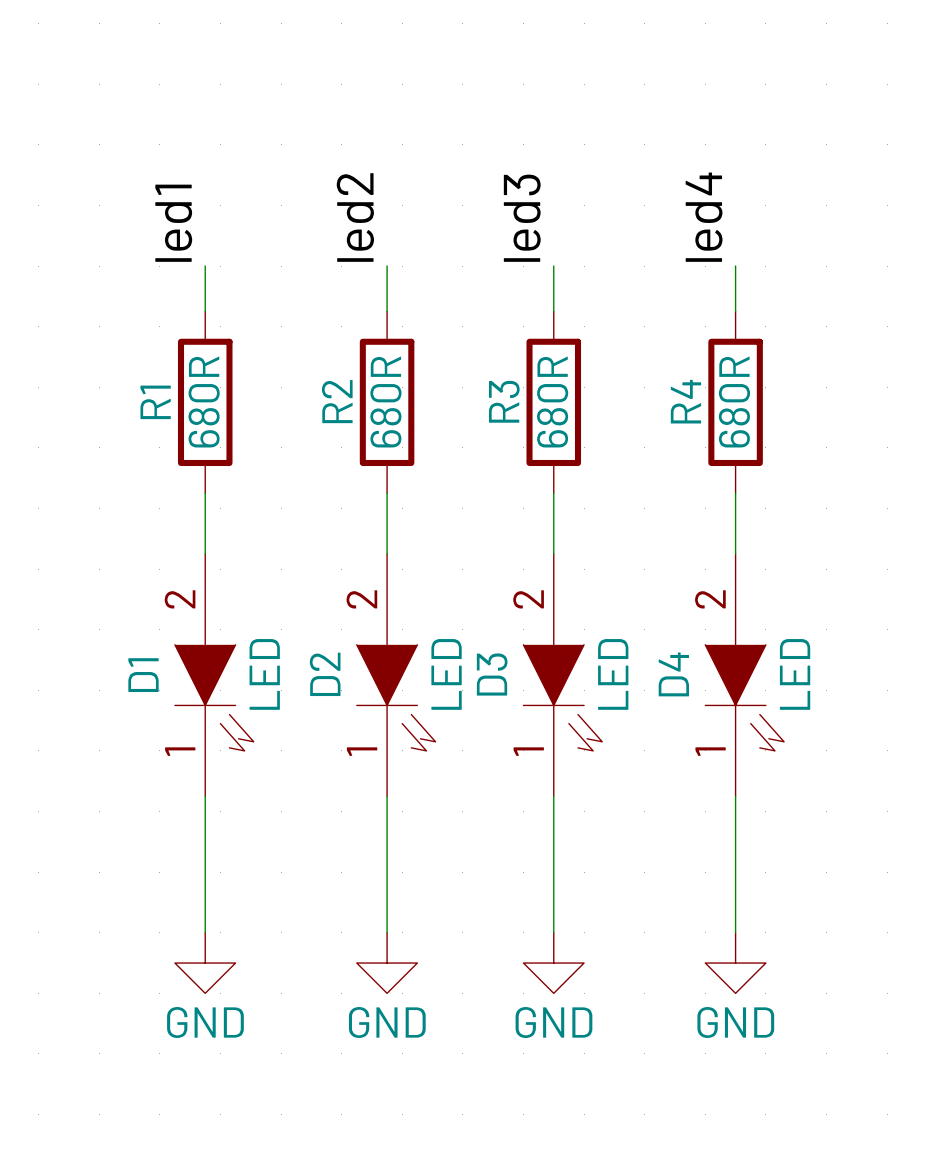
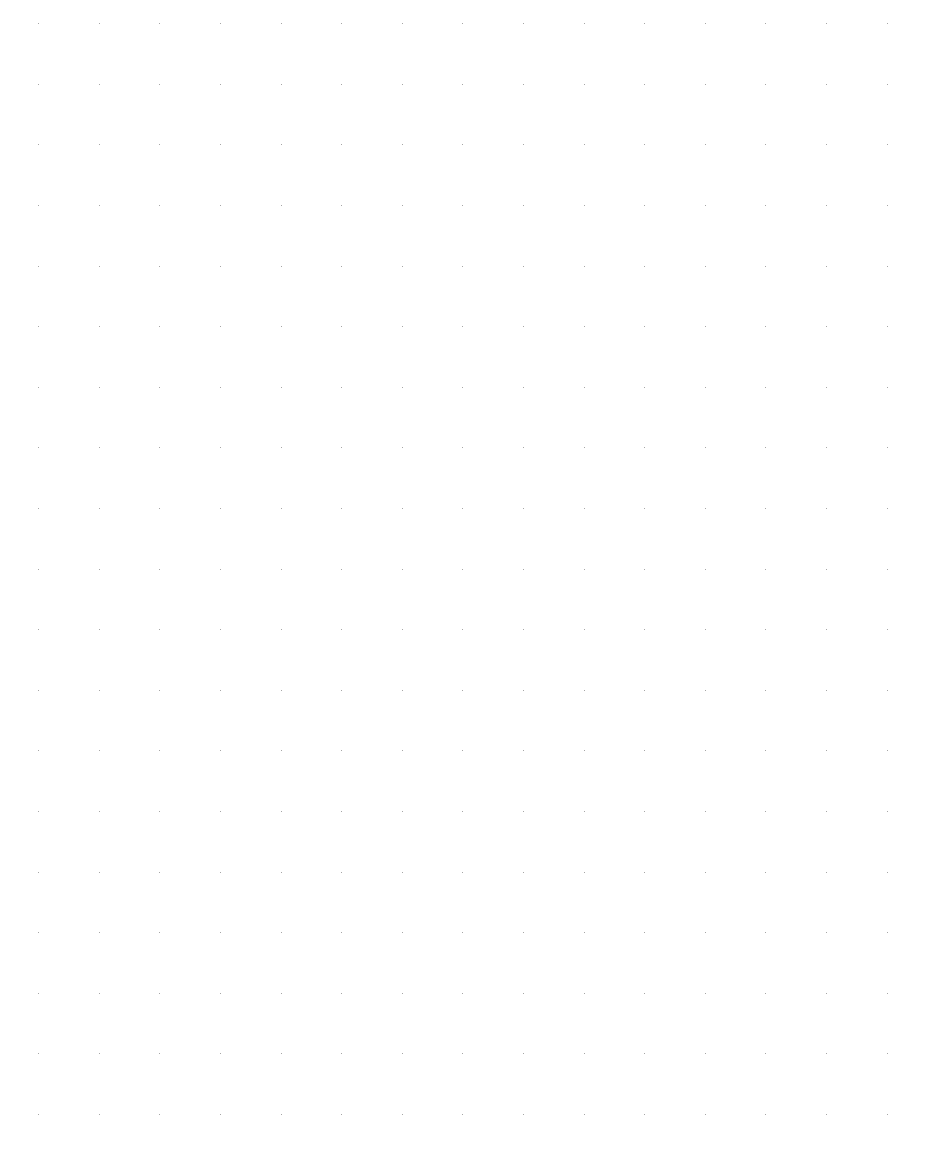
label: led2 (355, 217) -> none
label: led4 (704, 217) -> none
label: led3 (522, 218) -> none
label: led1 (173, 223) -> none
wire: (205, 266) (205, 311) -> none
wire: (387, 266) (387, 311) -> none
wire: (553, 266) (553, 311) -> none
wire: (735, 266) (735, 311) -> none
R1: 680R (205, 402) -> none
R2: 680R (387, 402) -> none
R3: 680R (553, 402) -> none
R4: 680R (735, 402) -> none
wire: (205, 493) (205, 553) -> none
wire: (387, 493) (387, 553) -> none
wire: (553, 493) (553, 553) -> none
wire: (735, 493) (735, 553) -> none
D1: LED (214, 675) -> none
D2: LED (396, 675) -> none
D3: LED (562, 675) -> none
D4: LED (744, 675) -> none
wire: (205, 796) (205, 932) -> none
wire: (387, 796) (387, 932) -> none
wire: (553, 796) (553, 932) -> none
wire: (735, 796) (735, 932) -> none
power symbol: GND (205, 963) -> none
power symbol: GND (387, 963) -> none
power symbol: GND (553, 963) -> none
power symbol: GND (735, 963) -> none

